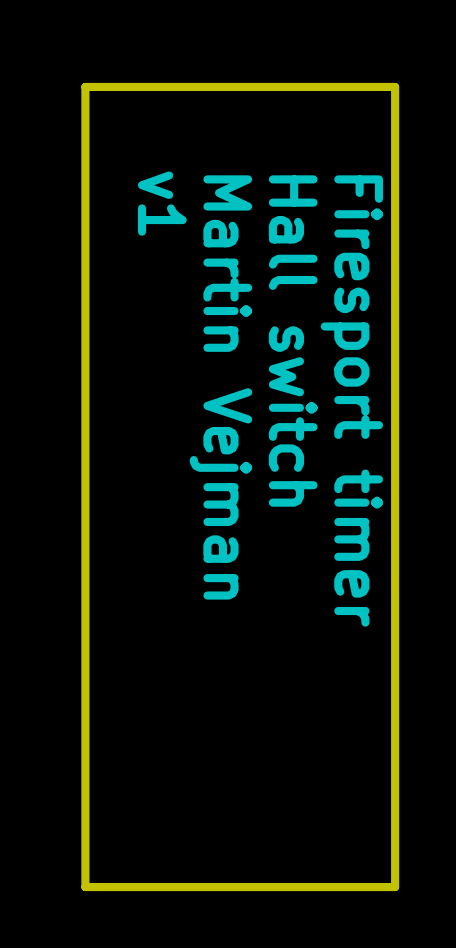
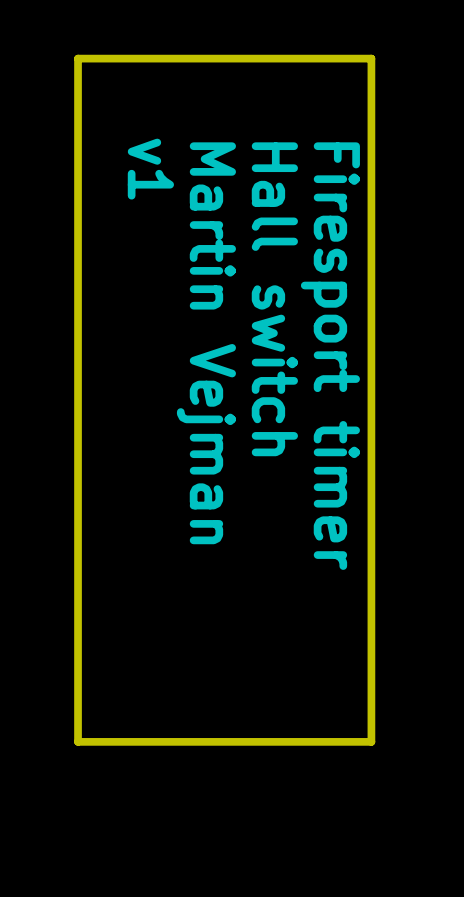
board edge: (395, 808) (395, 887) (85, 887) (85, 808) -> (371, 741) (78, 741)

